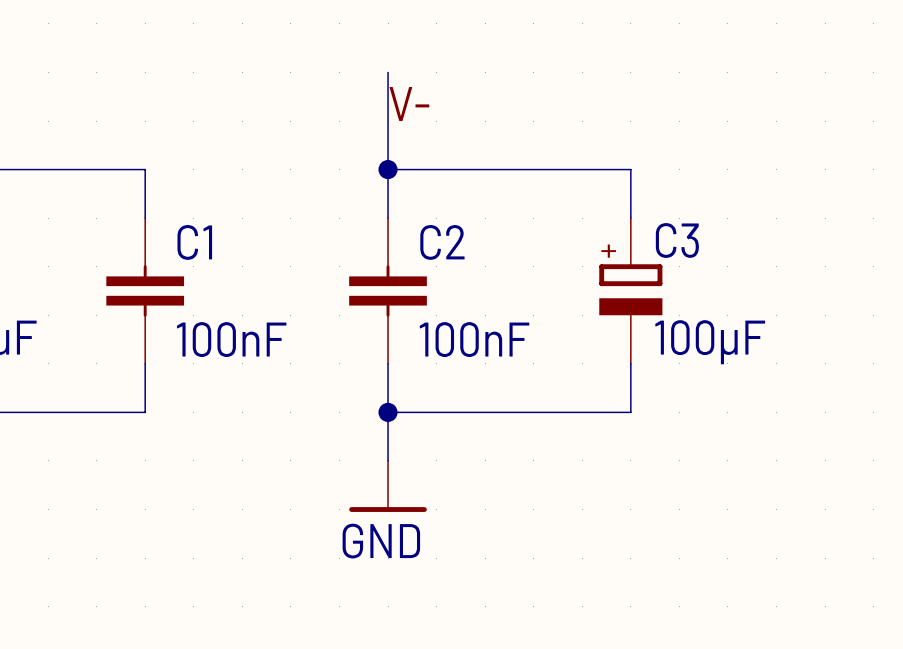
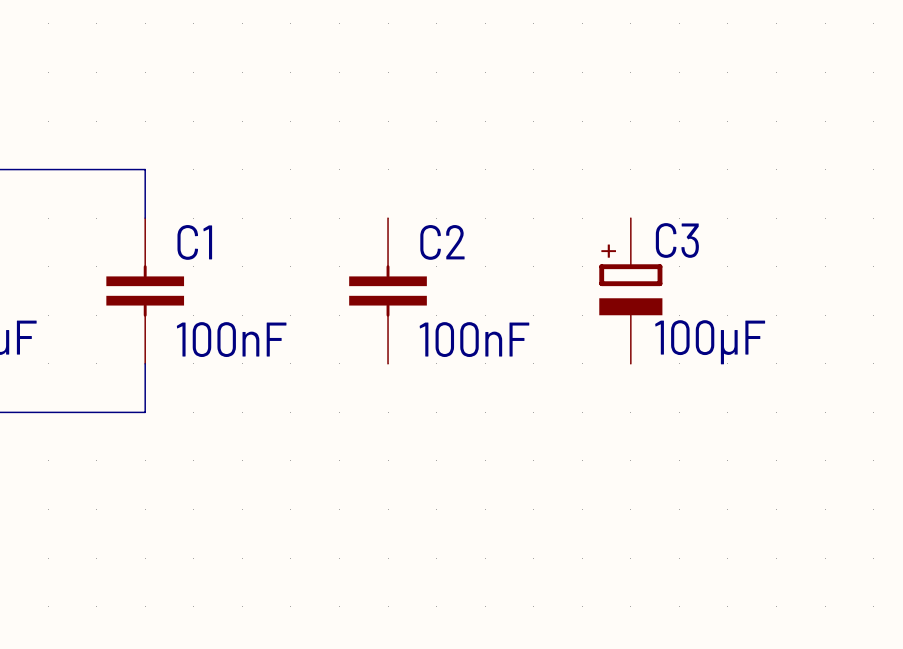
wire: (388, 72) (388, 218) -> none
label: V- (409, 104) -> none
wire: (388, 169) (630, 169) (630, 218) -> none
junction: (388, 169) -> none
wire: (388, 363) (388, 460) -> none
wire: (630, 363) (630, 412) (388, 412) -> none
junction: (388, 412) -> none
power symbol: GND (388, 486) -> none

